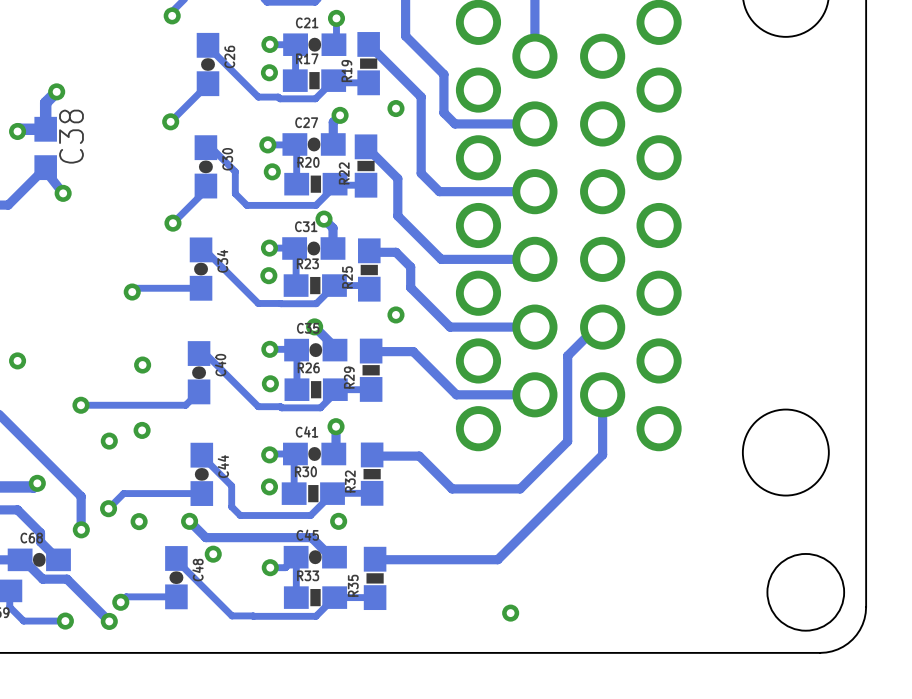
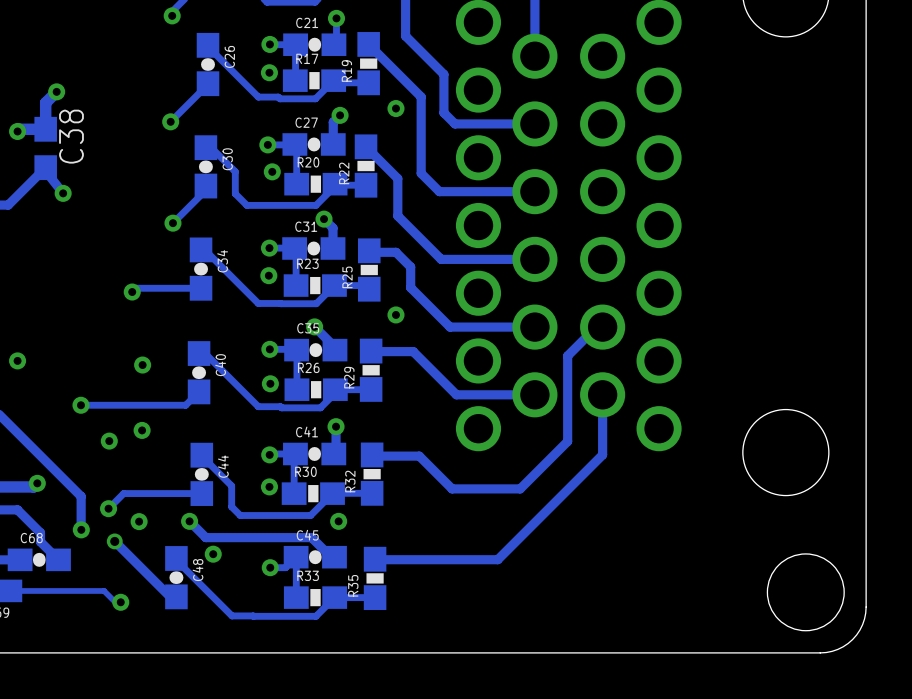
via: none -> (114, 541)
track: (20, 559) (23, 559) (42, 579) (67, 579) (109, 621) -> none
track: (9, 590) (9, 607) (23, 621) (65, 621) -> (9, 590) (104, 590) (117, 604)
track: (170, 596) (126, 596) (120, 602) -> (170, 596) (114, 541)
via: (510, 613) -> none
via: (65, 621) -> none
via: (109, 621) -> none

